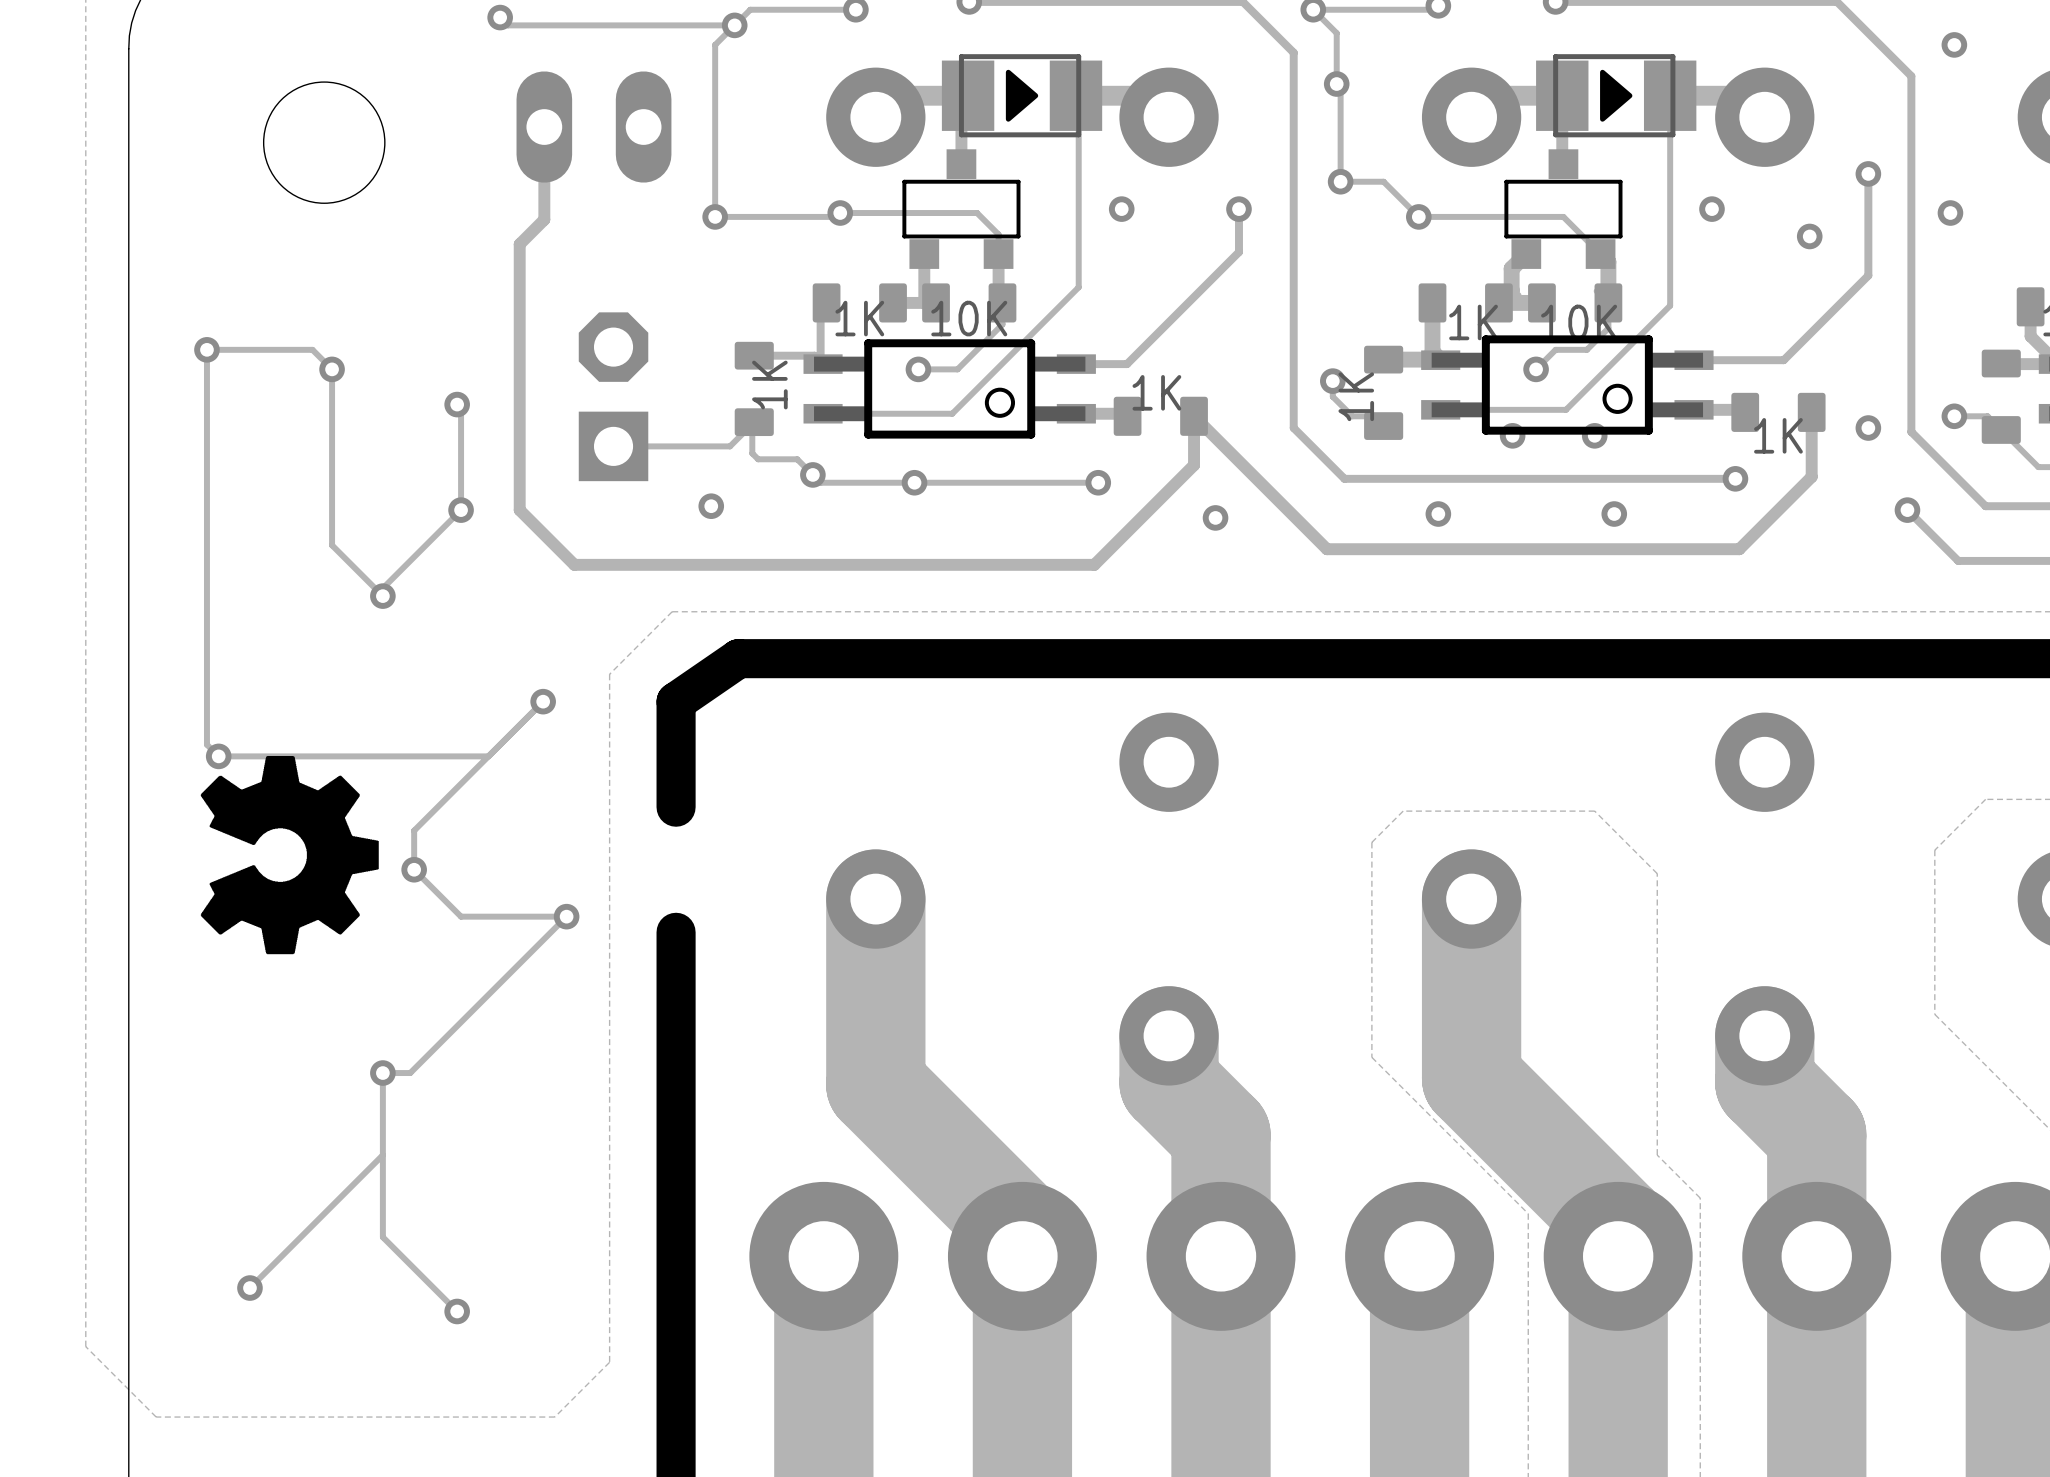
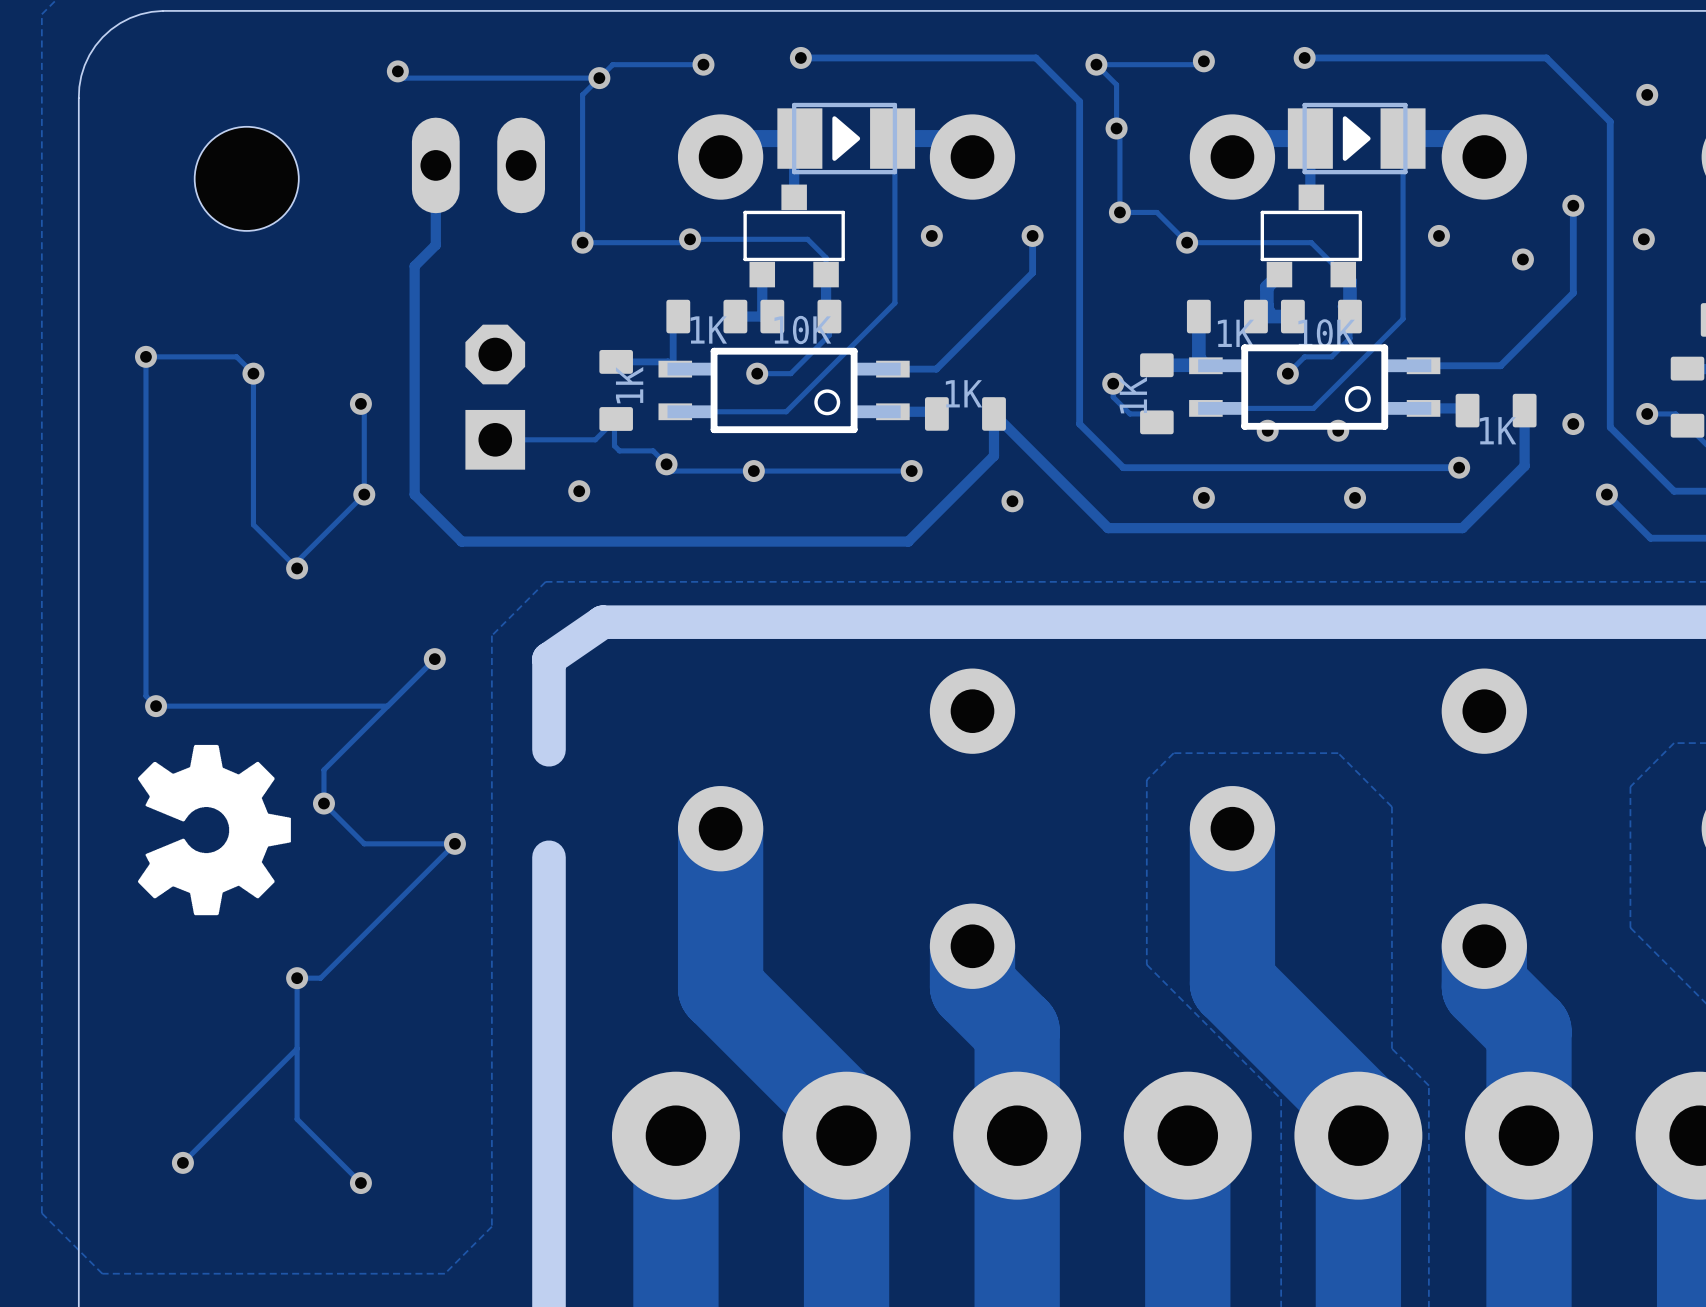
drawing position: (289, 855) -> (214, 830)

